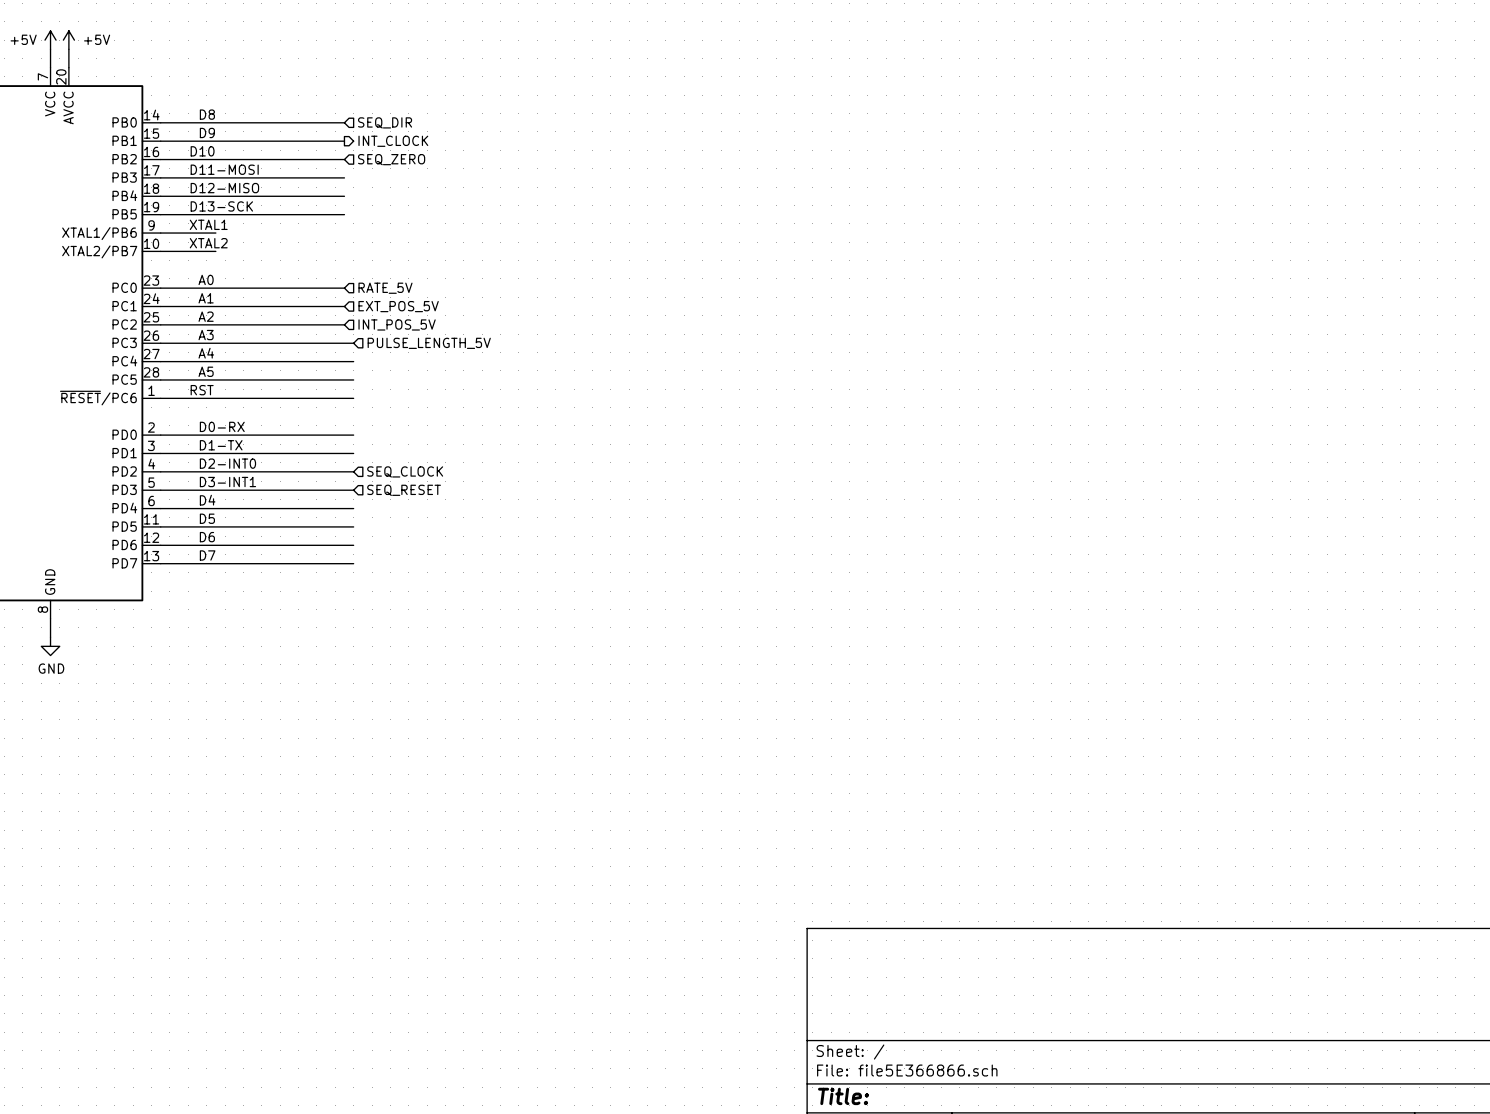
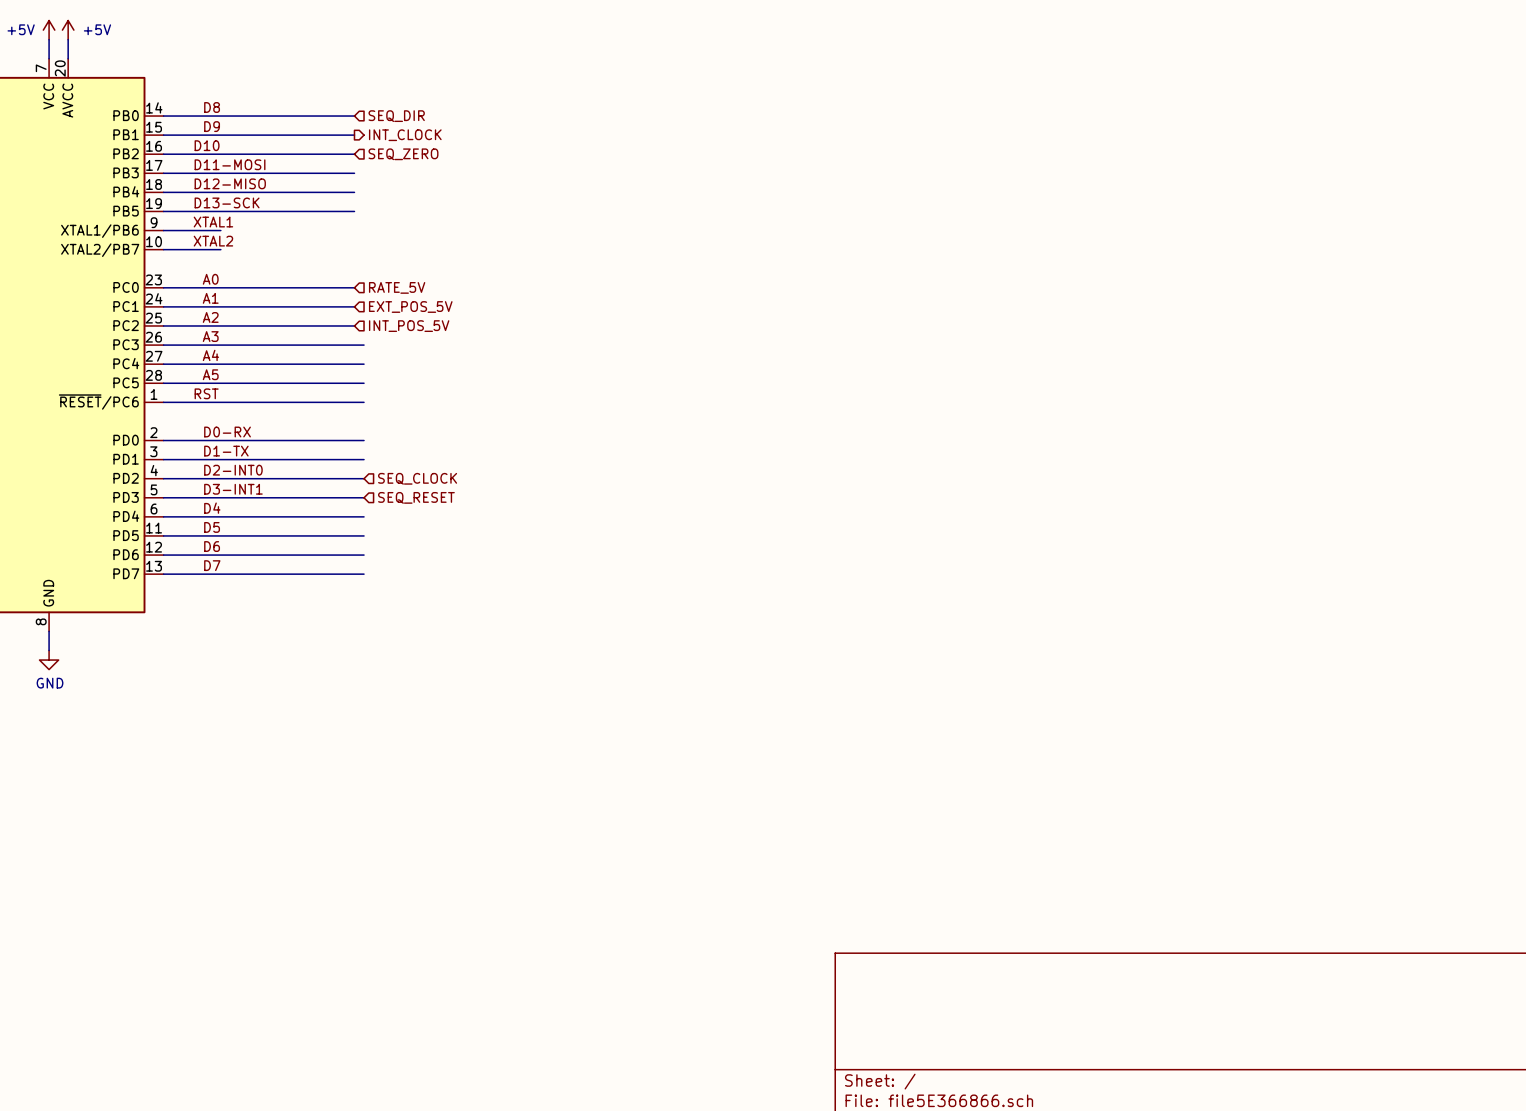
hierarchical label: PULSE_LENGTH_5V (429, 343) -> none

